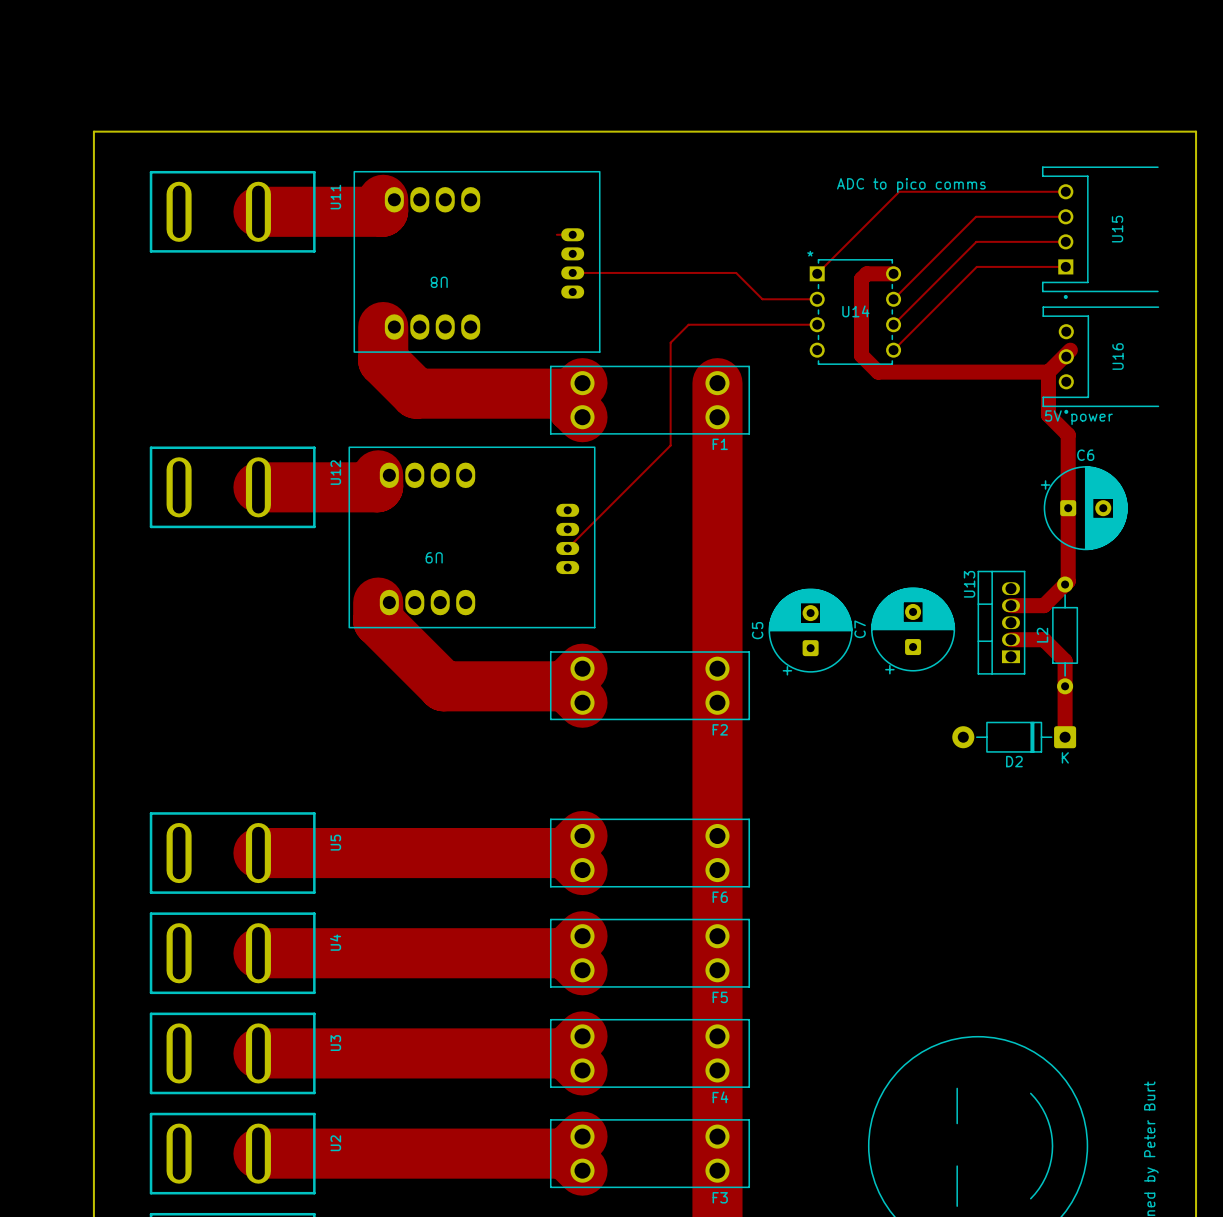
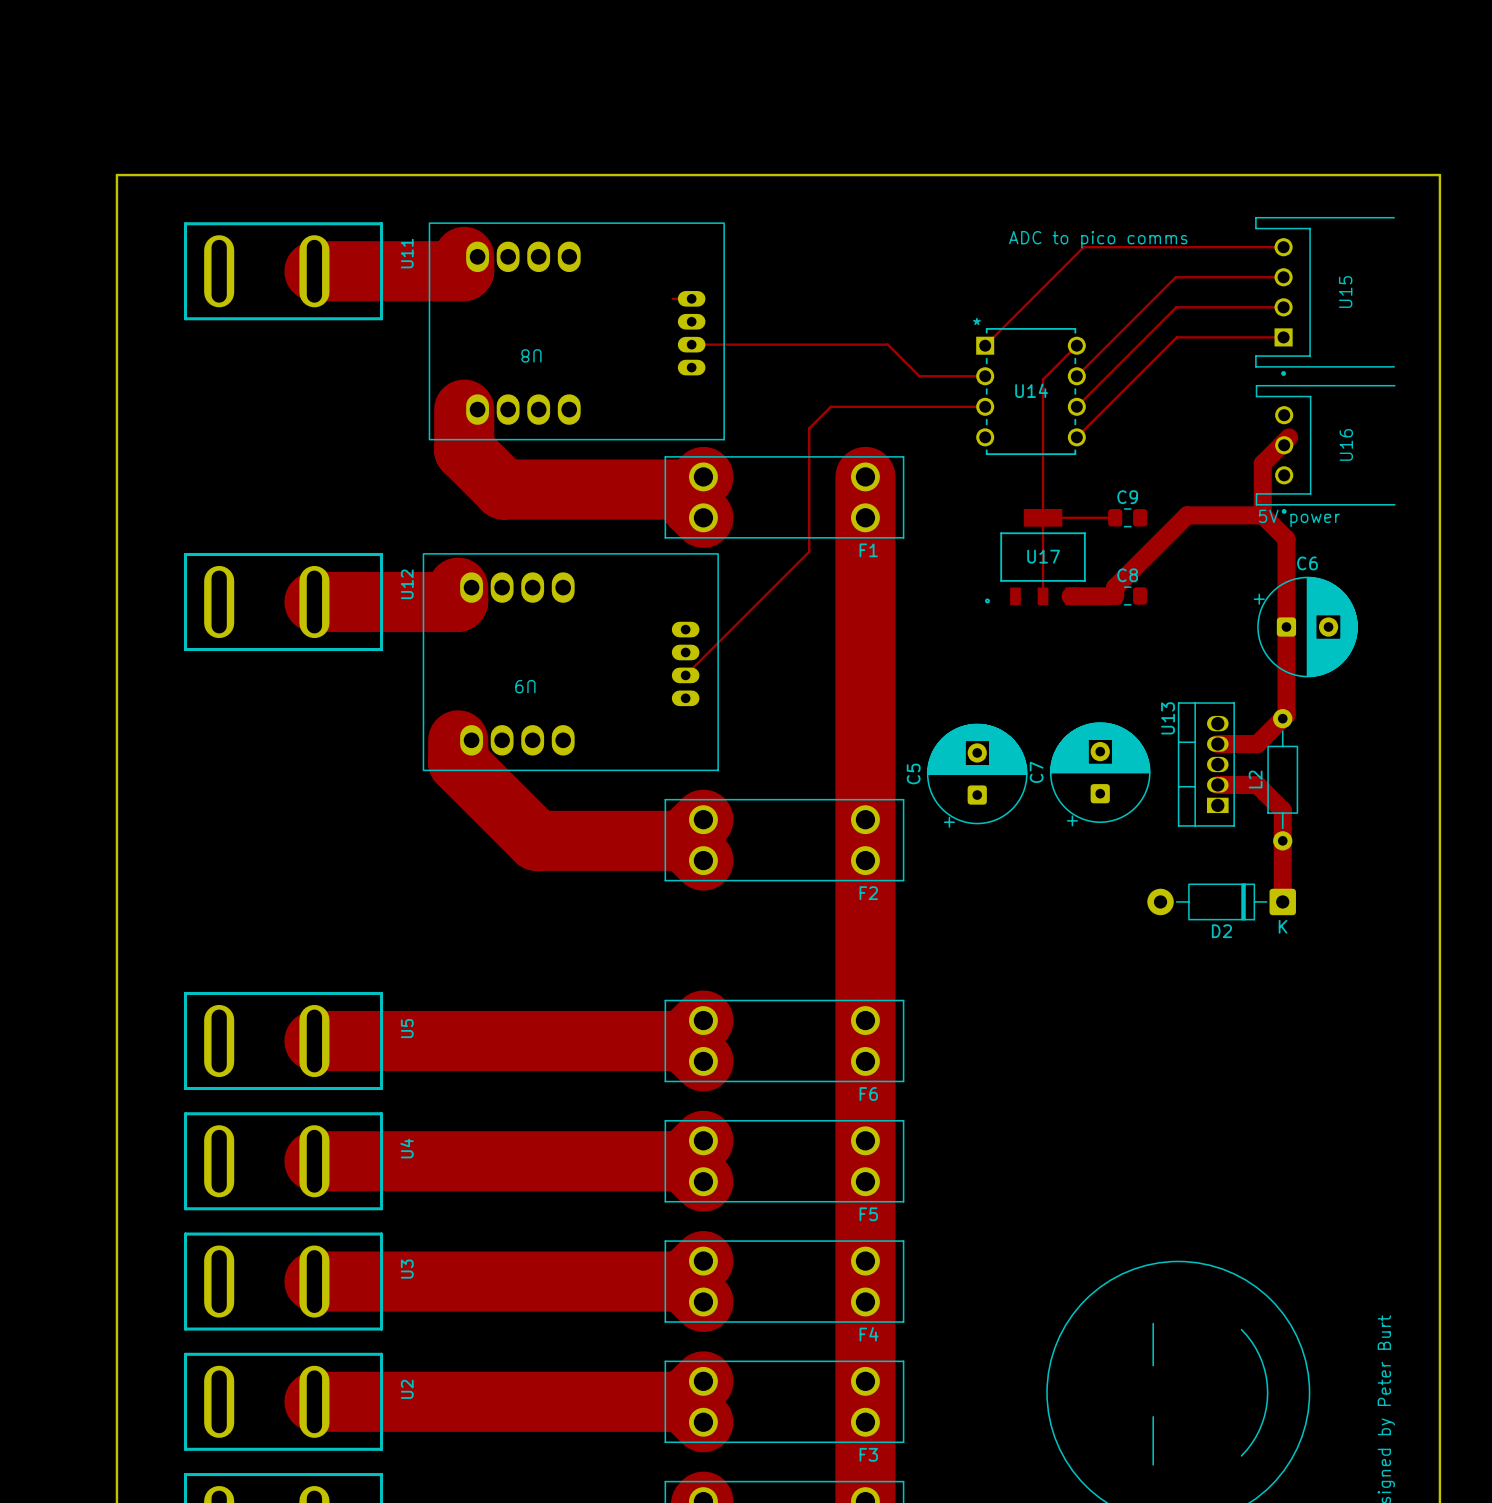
track: (893, 273) (866, 273) (861, 279) (861, 355) (878, 372) (1048, 372) -> (1076, 345) (1043, 379) (1043, 596)
track: none -> (1262, 515) (1187, 515) (1115, 587) (1115, 595) (1070, 596)
track: none -> (1043, 517) (1115, 517)
C9: none -> (1127, 517)
U17: none -> (1035, 557)
C8: none -> (1127, 595)

